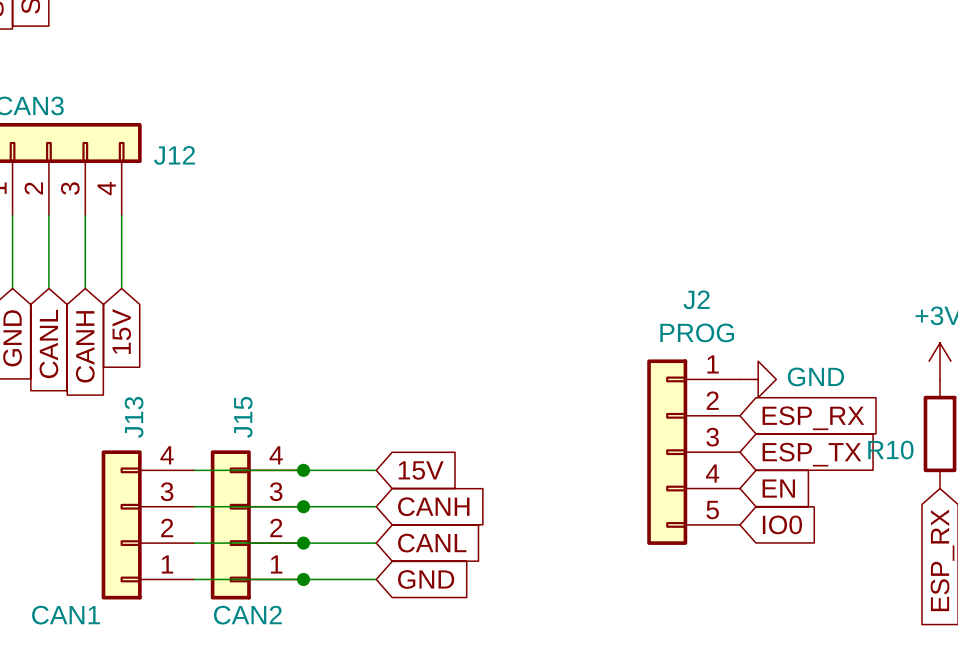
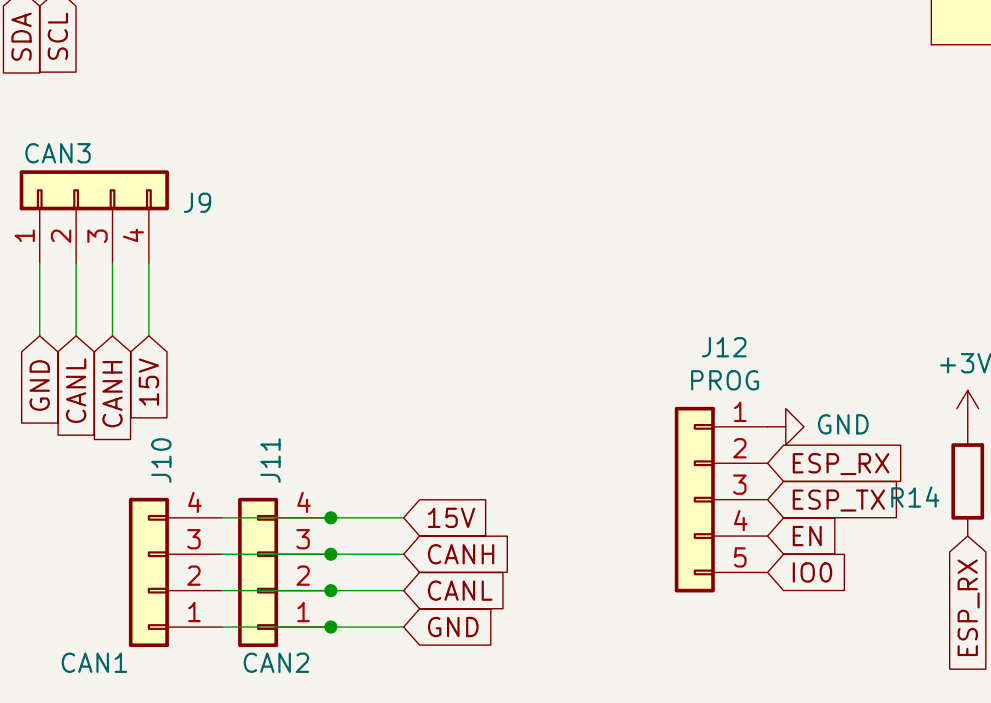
J12 name: J12 (174, 155) -> J9 (197, 202)
J2 name: J2 (696, 299) -> J12 (724, 347)
J13 name: J13 (134, 417) -> J10 (161, 460)
J15 name: J15 (243, 417) -> J11 (270, 460)
R10 name: R10 (890, 450) -> R14 (915, 497)

